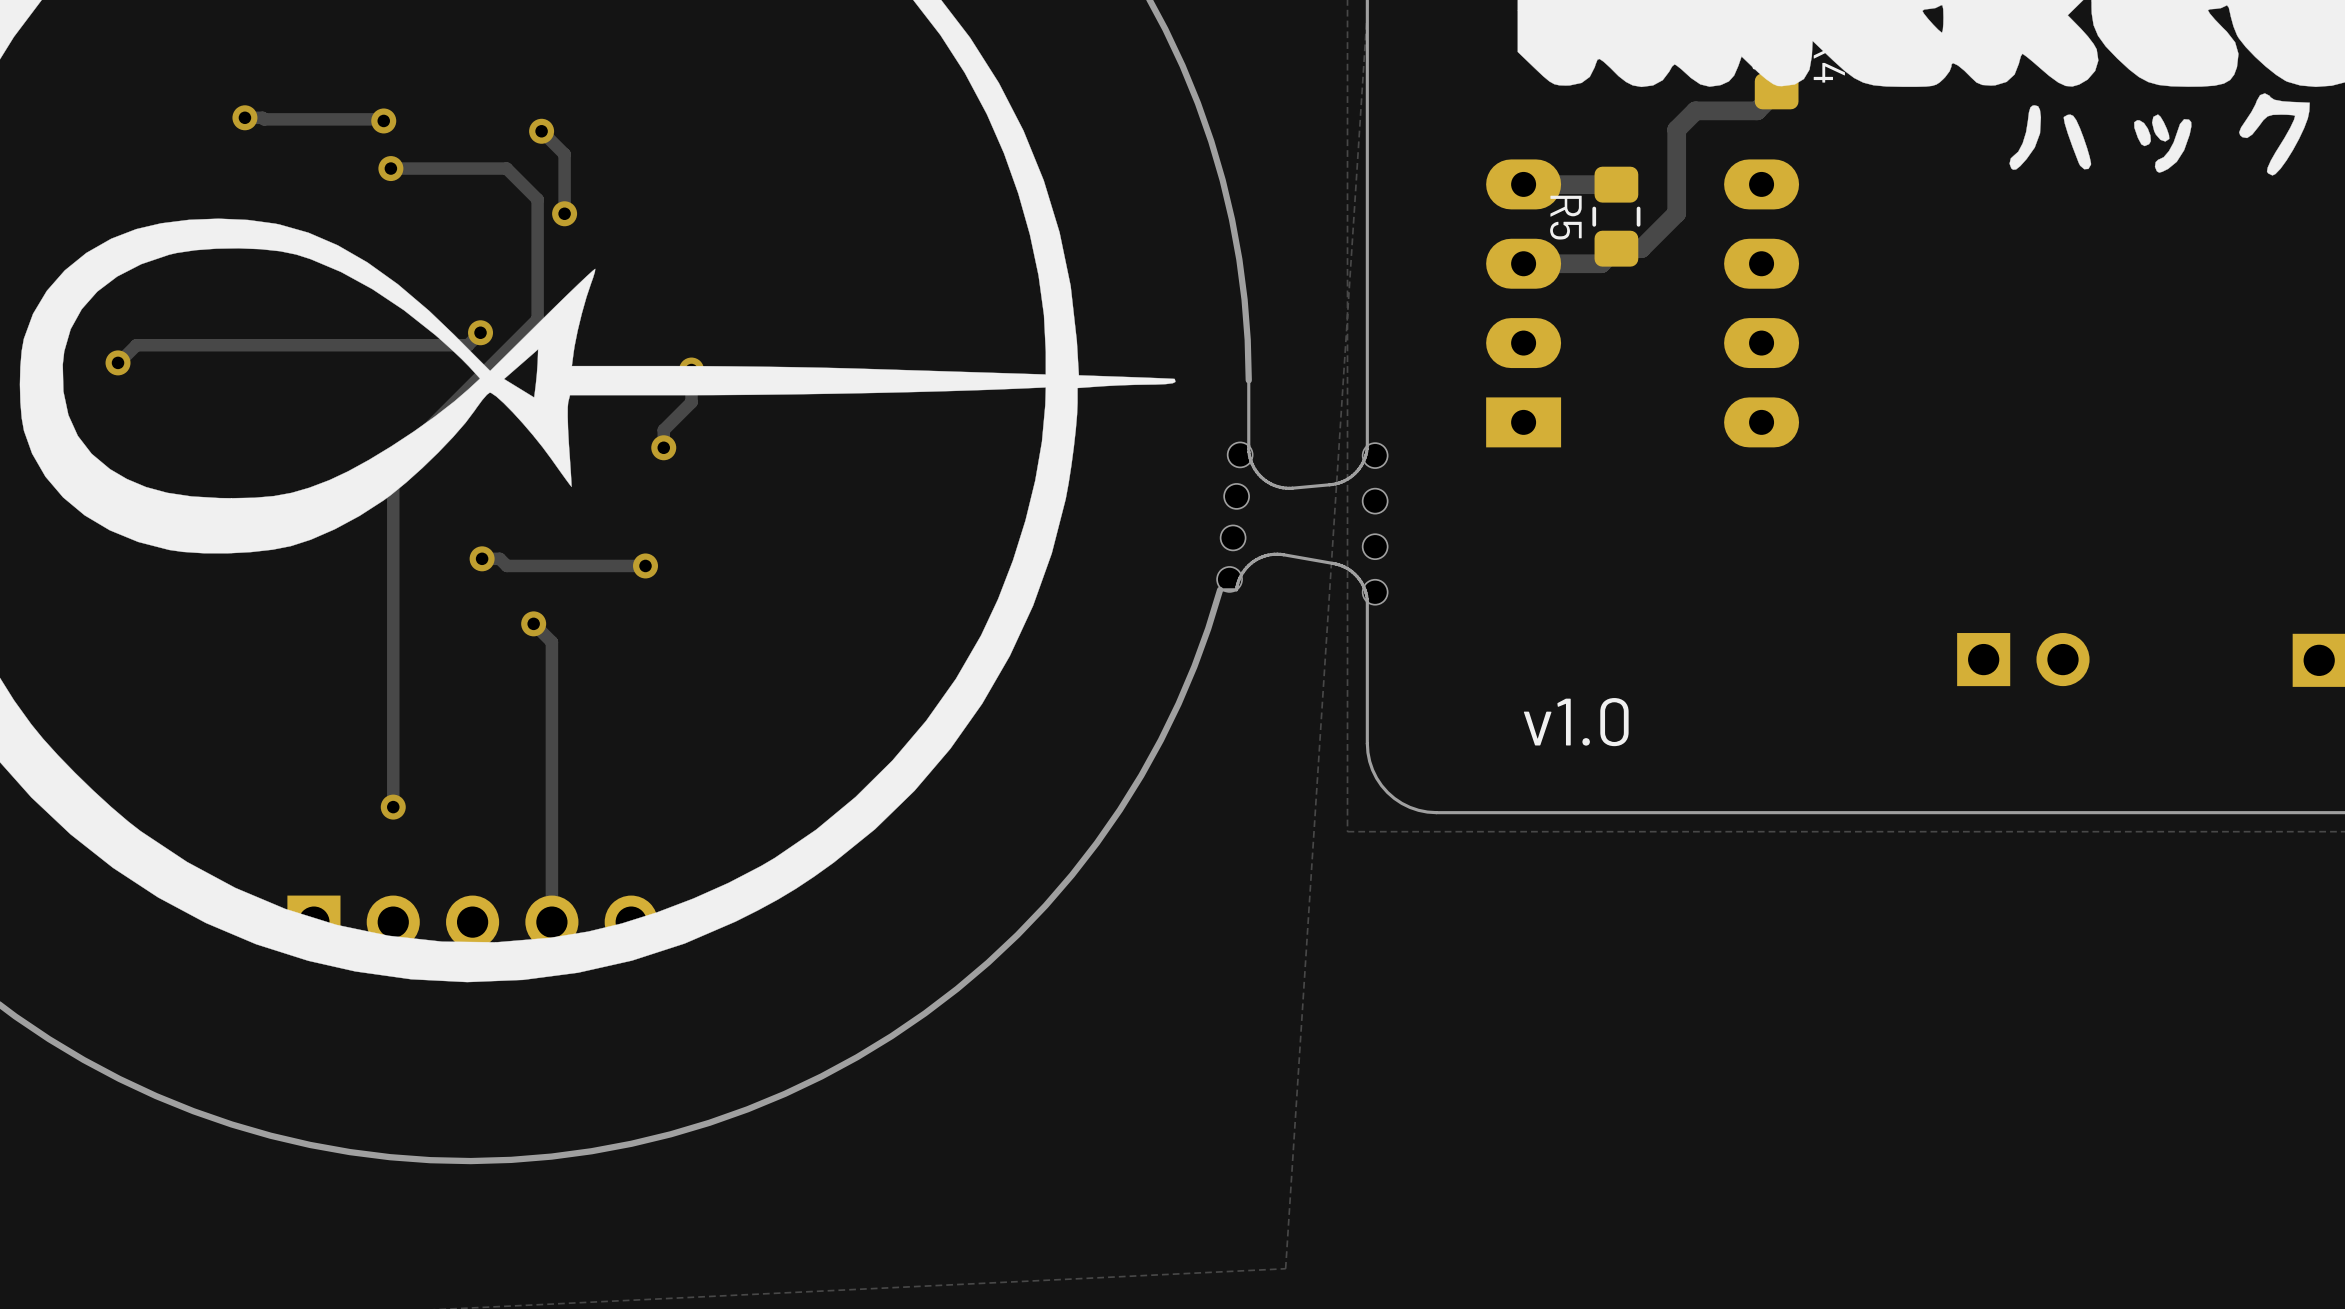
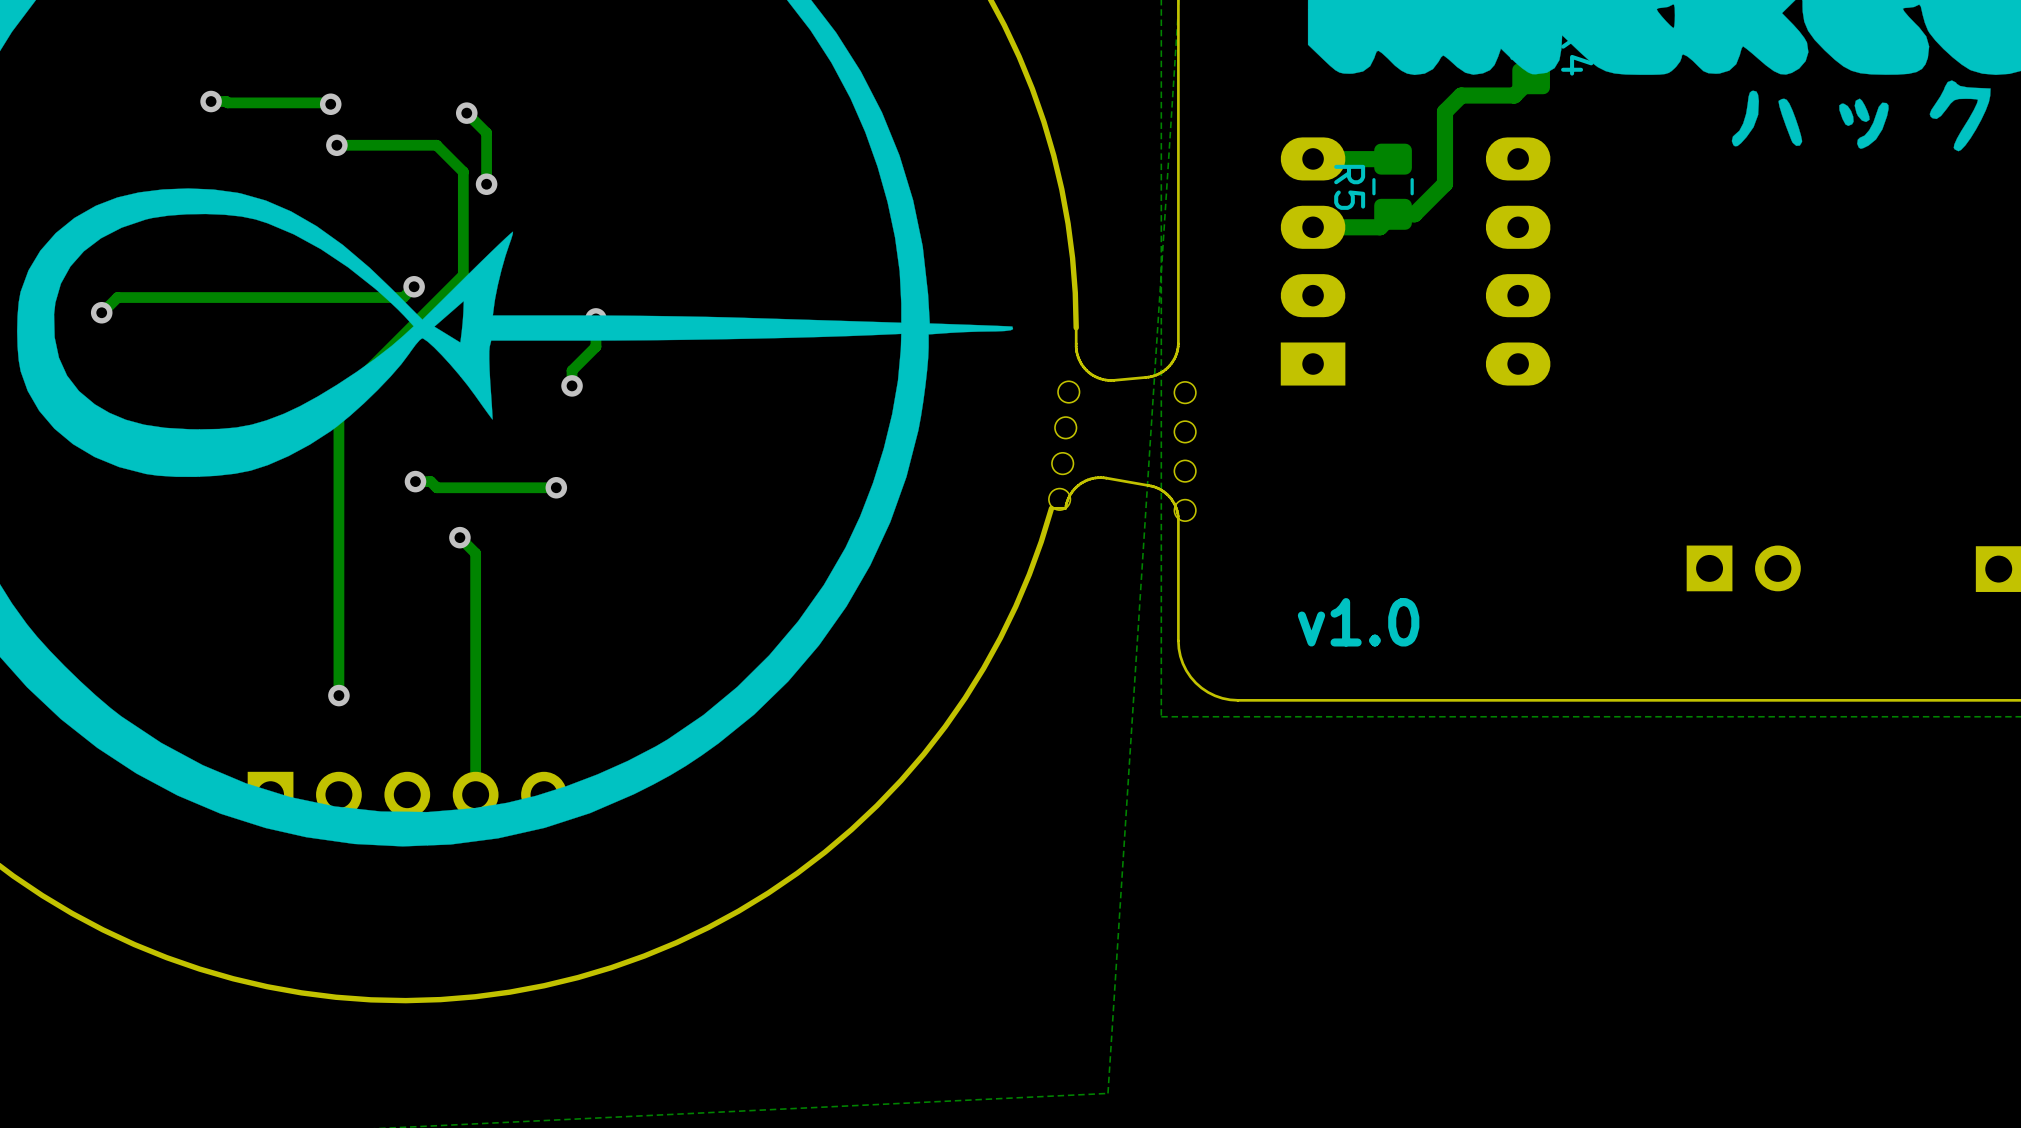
board edge: (1367, 399) (1367, 448) (1363, 460) (1357, 471) (1347, 479) (1335, 483) (1289, 488) (1268, 482) (1258, 474) (1252, 464) (1248, 448) (1248, 399) -> (1178, 343) (1174, 359) (1161, 372) (1148, 377) (1111, 380) (1097, 377) (1084, 368) (1078, 357) (1076, 343)

